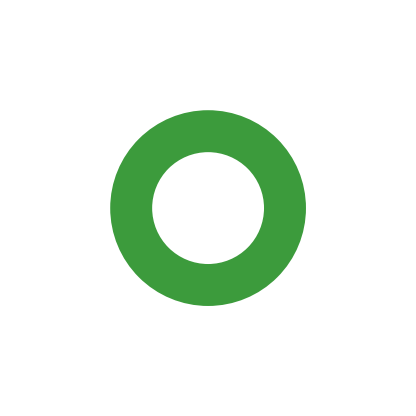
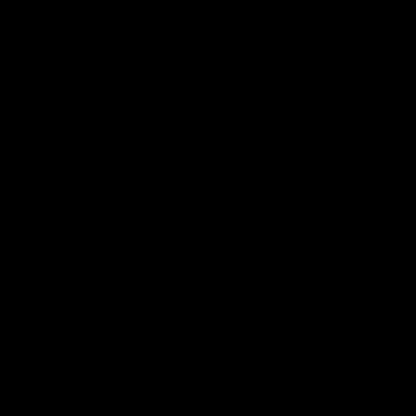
part: (208, 208) -> none

